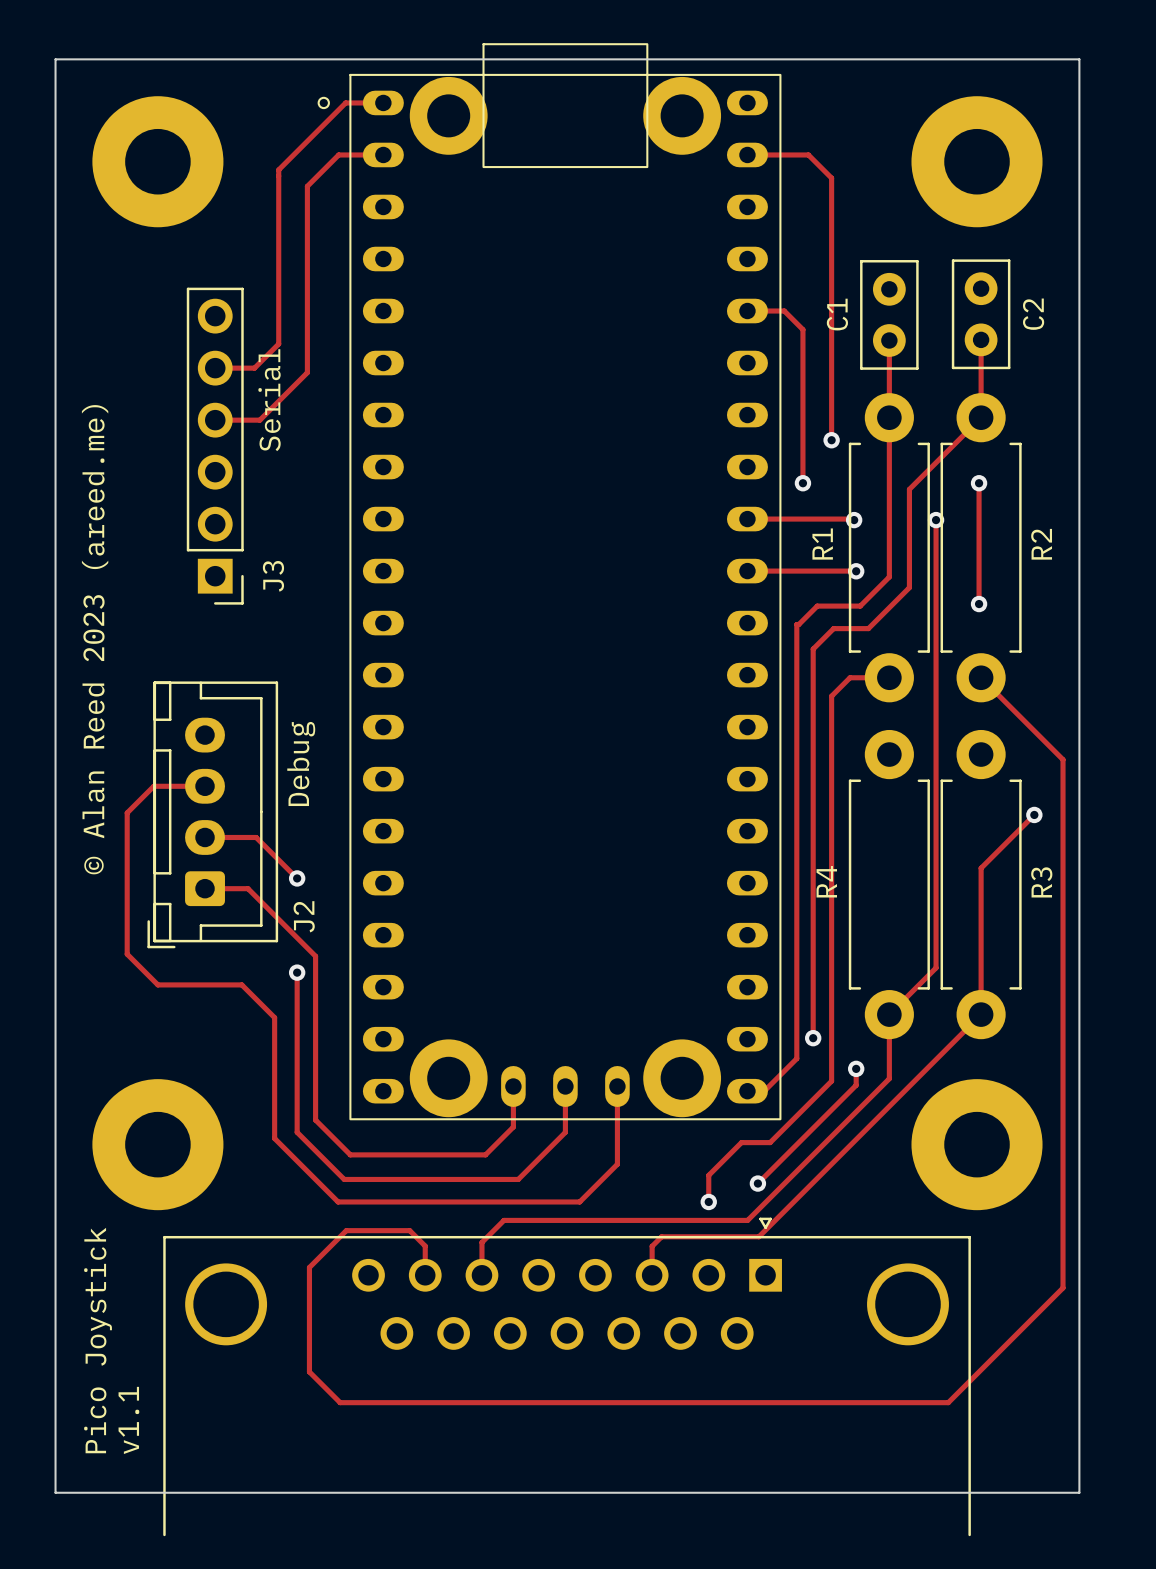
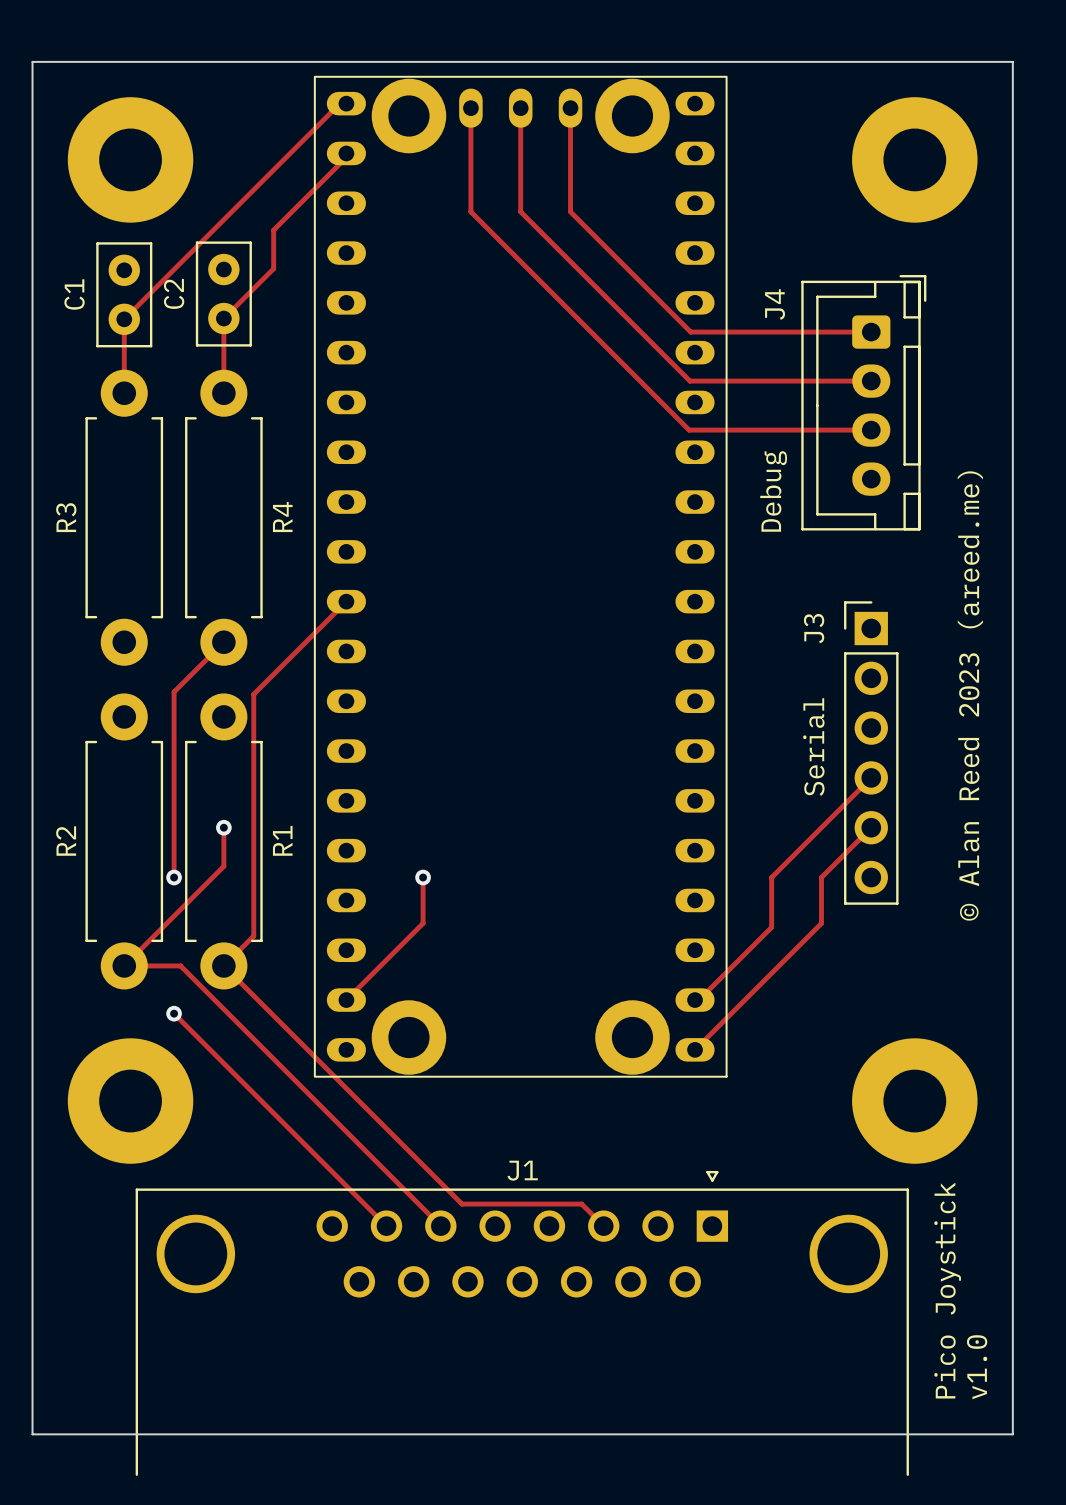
track: (376, 102) (345, 102) (278, 169) (278, 343) (254, 368) (215, 368) -> (339, 103) (124, 319) (124, 393)
track: none -> (470, 108) (470, 211) (689, 430) (871, 430)
track: none -> (520, 108) (520, 211) (689, 381) (871, 381)
track: none -> (570, 108) (570, 211) (690, 332) (871, 332)
track: (383, 154) (338, 154) (307, 186) (307, 235) -> (346, 153) (346, 157) (273, 230)
track: (747, 154) (808, 154) (831, 178) (831, 440) -> none
track: (307, 275) (307, 372) (259, 420) (215, 420) -> (273, 268) (223, 318) (223, 393)
track: (747, 311) (784, 311) (802, 329) (802, 483) -> none
C1 position: (889, 314) -> (124, 294)
C2 position: (981, 314) -> (223, 294)
C2 name position: C2 (1033, 314) -> C2 (174, 293)
track: (981, 339) (981, 417) (909, 489) (909, 587) (868, 628) (833, 628) (813, 649) (813, 1038) -> none
track: (889, 340) (889, 577) (860, 606) (817, 606) (796, 624) (796, 1058) (764, 1091) (747, 1091) -> (871, 827) (821, 877) (821, 923) (695, 1049)
text: Serial (269, 400) -> none
J4: none -> (863, 402)
via: (831, 440) -> none
J3 rotation: 0° (215, 446) -> 180° (871, 753)
J3 position: (215, 446) -> (871, 753)
via: (802, 483) -> none
track: (979, 483) (979, 604) -> none
via: (979, 483) -> none
text: none -> Debug (773, 491)
track: (747, 519) (854, 520) -> none
via: (854, 520) -> none
track: (936, 520) (936, 967) (889, 1014) (889, 1078) (747, 1220) (503, 1220) (481, 1242) (481, 1275) -> (223, 827) (223, 866) (124, 965) (180, 965) (440, 1226)
via: (936, 520) -> none
R1 name position: R1 (822, 544) -> R1 (282, 840)
R2 name position: R2 (1041, 544) -> R2 (66, 841)
R1 position: (889, 547) -> (223, 841)
R2 position: (981, 547) -> (124, 841)
track: (747, 571) (855, 571) -> none
via: (856, 571) -> none
part: (549, 581) -> none
part: none -> (520, 576)
via: (979, 604) -> none
text: © Alan Reed 2023 (areed.me) (95, 639) -> none
track: none -> (223, 642) (174, 692) (174, 877)
track: (889, 677) (850, 677) (831, 696) (831, 1081) (770, 1142) (741, 1142) (708, 1175) (708, 1201) -> none
track: (981, 677) (1063, 759) (1063, 1287) (948, 1402) (340, 1402) (309, 1371) (309, 1267) (346, 1230) (409, 1230) (425, 1246) (425, 1275) -> (174, 1013) (386, 1226)
text: none -> © Alan Reed 2023 (areed.me) (970, 696)
text: Debug (301, 763) -> none
text: none -> Serial (813, 747)
track: (205, 786) (153, 786) (127, 812) (127, 954) (157, 984) (241, 984) (274, 1017) (274, 1138) (338, 1201) (579, 1201) (617, 1164) (617, 1086) -> none
track: none -> (871, 777) (771, 877) (771, 927) (698, 1000) (695, 1000)
J2: (212, 814) -> none
track: (1034, 814) (981, 868) (981, 1014) (758, 1236) (661, 1236) (652, 1246) (652, 1275) -> (346, 601) (253, 694) (253, 936) (223, 965) (462, 1204) (581, 1204) (603, 1226)
via: (1034, 814) -> none
track: (205, 837) (256, 837) (297, 878) -> none
via position: (297, 878) -> (223, 827)
R4 name position: R4 (826, 881) -> R4 (282, 517)
R3 name position: R3 (1041, 882) -> R3 (66, 517)
R4 position: (889, 884) -> (223, 517)
R3 position: (981, 884) -> (124, 517)
track: (205, 888) (248, 888) (315, 956) (315, 1120) (350, 1154) (485, 1154) (513, 1127) (513, 1086) -> none
via: none -> (174, 877)
track: none -> (423, 877) (423, 923) (346, 1000)
via: none -> (423, 877)
track: (297, 972) (297, 1132) (344, 1179) (518, 1179) (565, 1132) (565, 1086) -> none
via: (297, 972) -> none
via: (813, 1038) -> none
via: none -> (174, 1013)
track: (856, 1068) (856, 1085) (757, 1183) -> none
via: (856, 1068) -> none
via: (757, 1183) -> none
via: (708, 1201) -> none
J1 name: none -> J1 (522, 1170)
text: Pico Joystick (98, 1340) -> none
text: none -> Pico Joystick (947, 1290)
text: v1.1 (128, 1420) -> none
text: none -> v1.0 (977, 1367)

